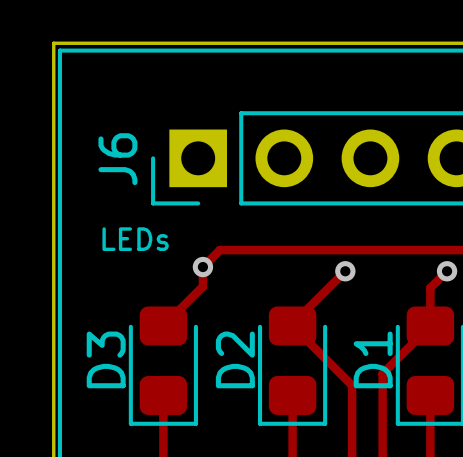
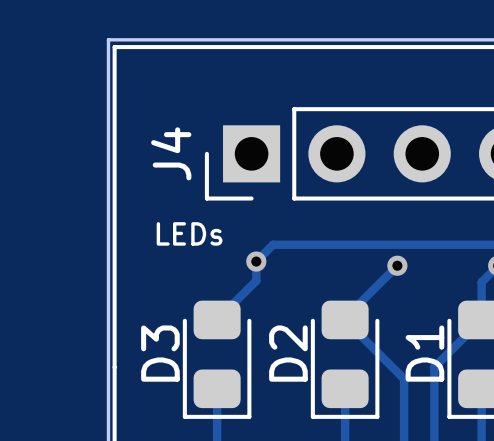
J6 name: J6 (117, 159) -> J4 (171, 153)

